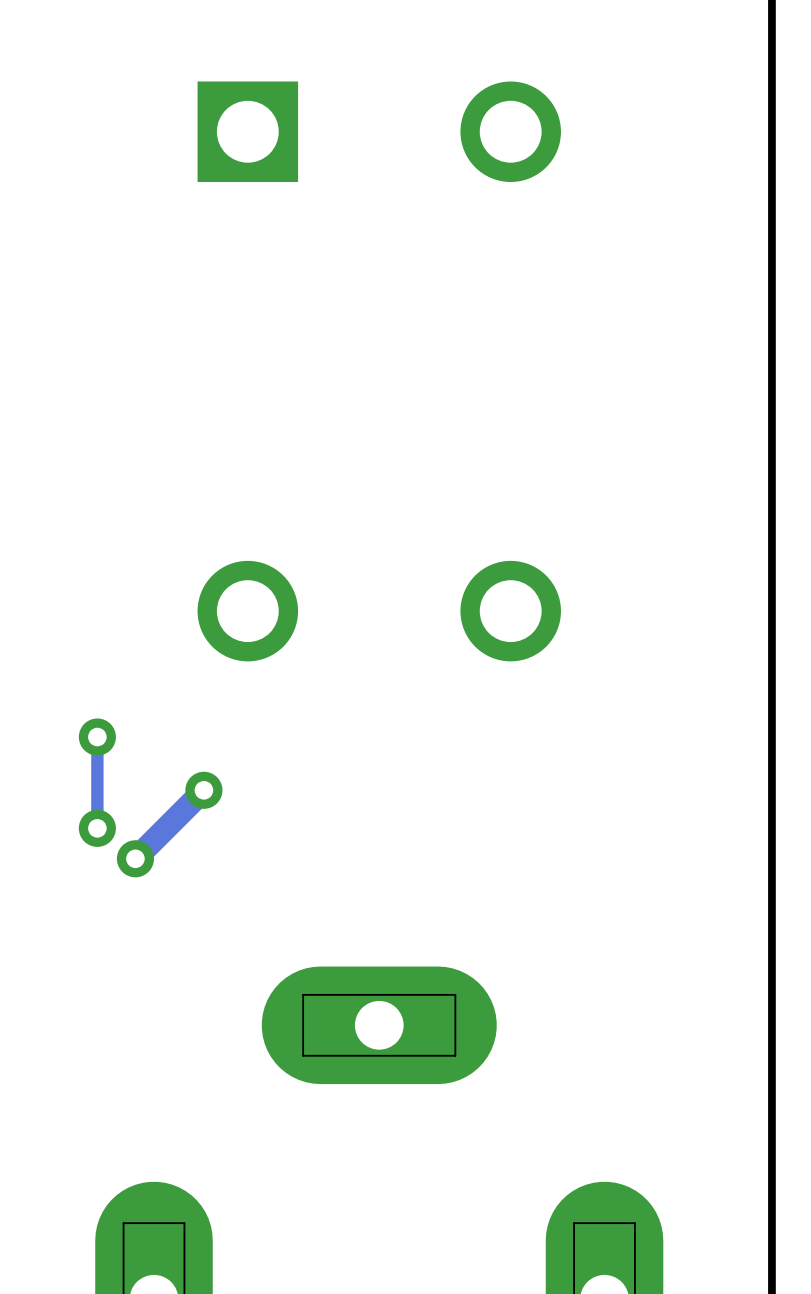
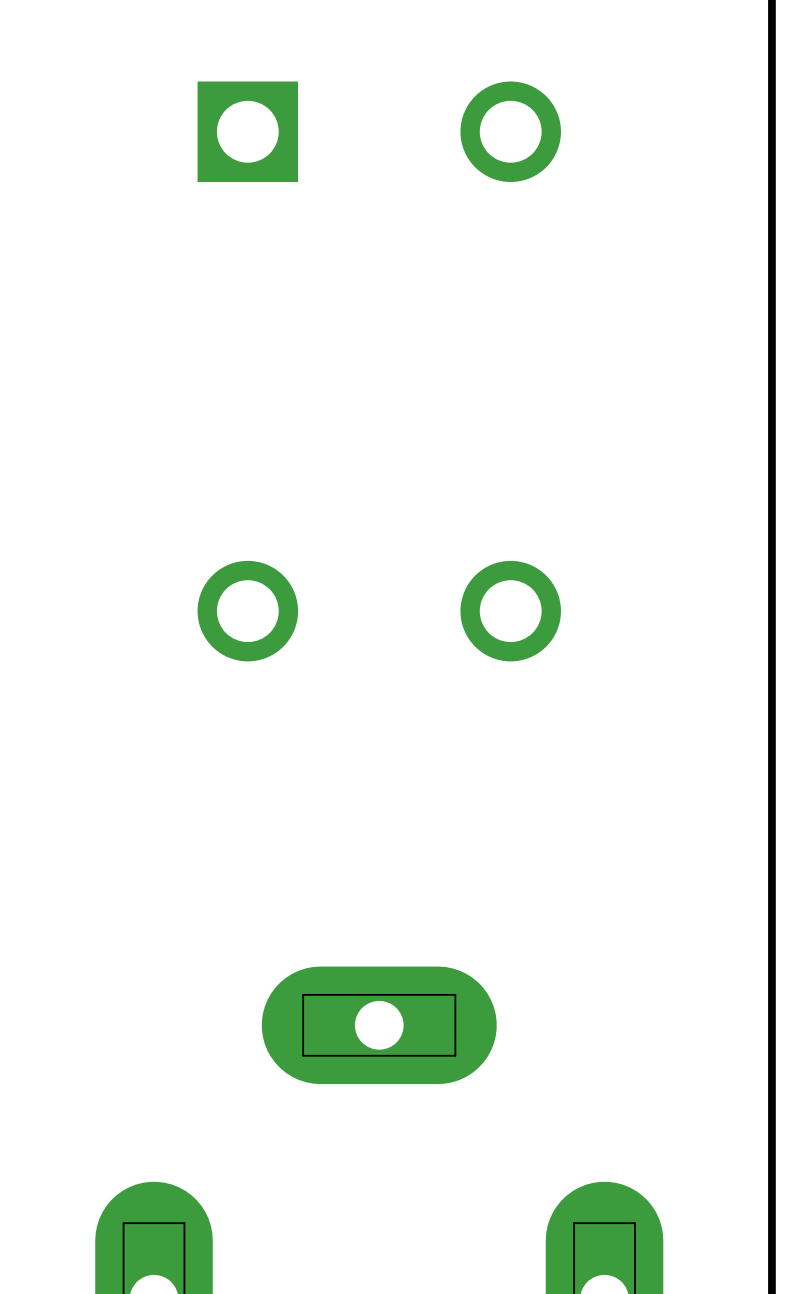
track: (97, 737) (97, 828) -> none
via: (97, 737) -> none
track: (203, 790) (135, 858) -> none
via: (203, 790) -> none
via: (97, 828) -> none
via: (135, 858) -> none

